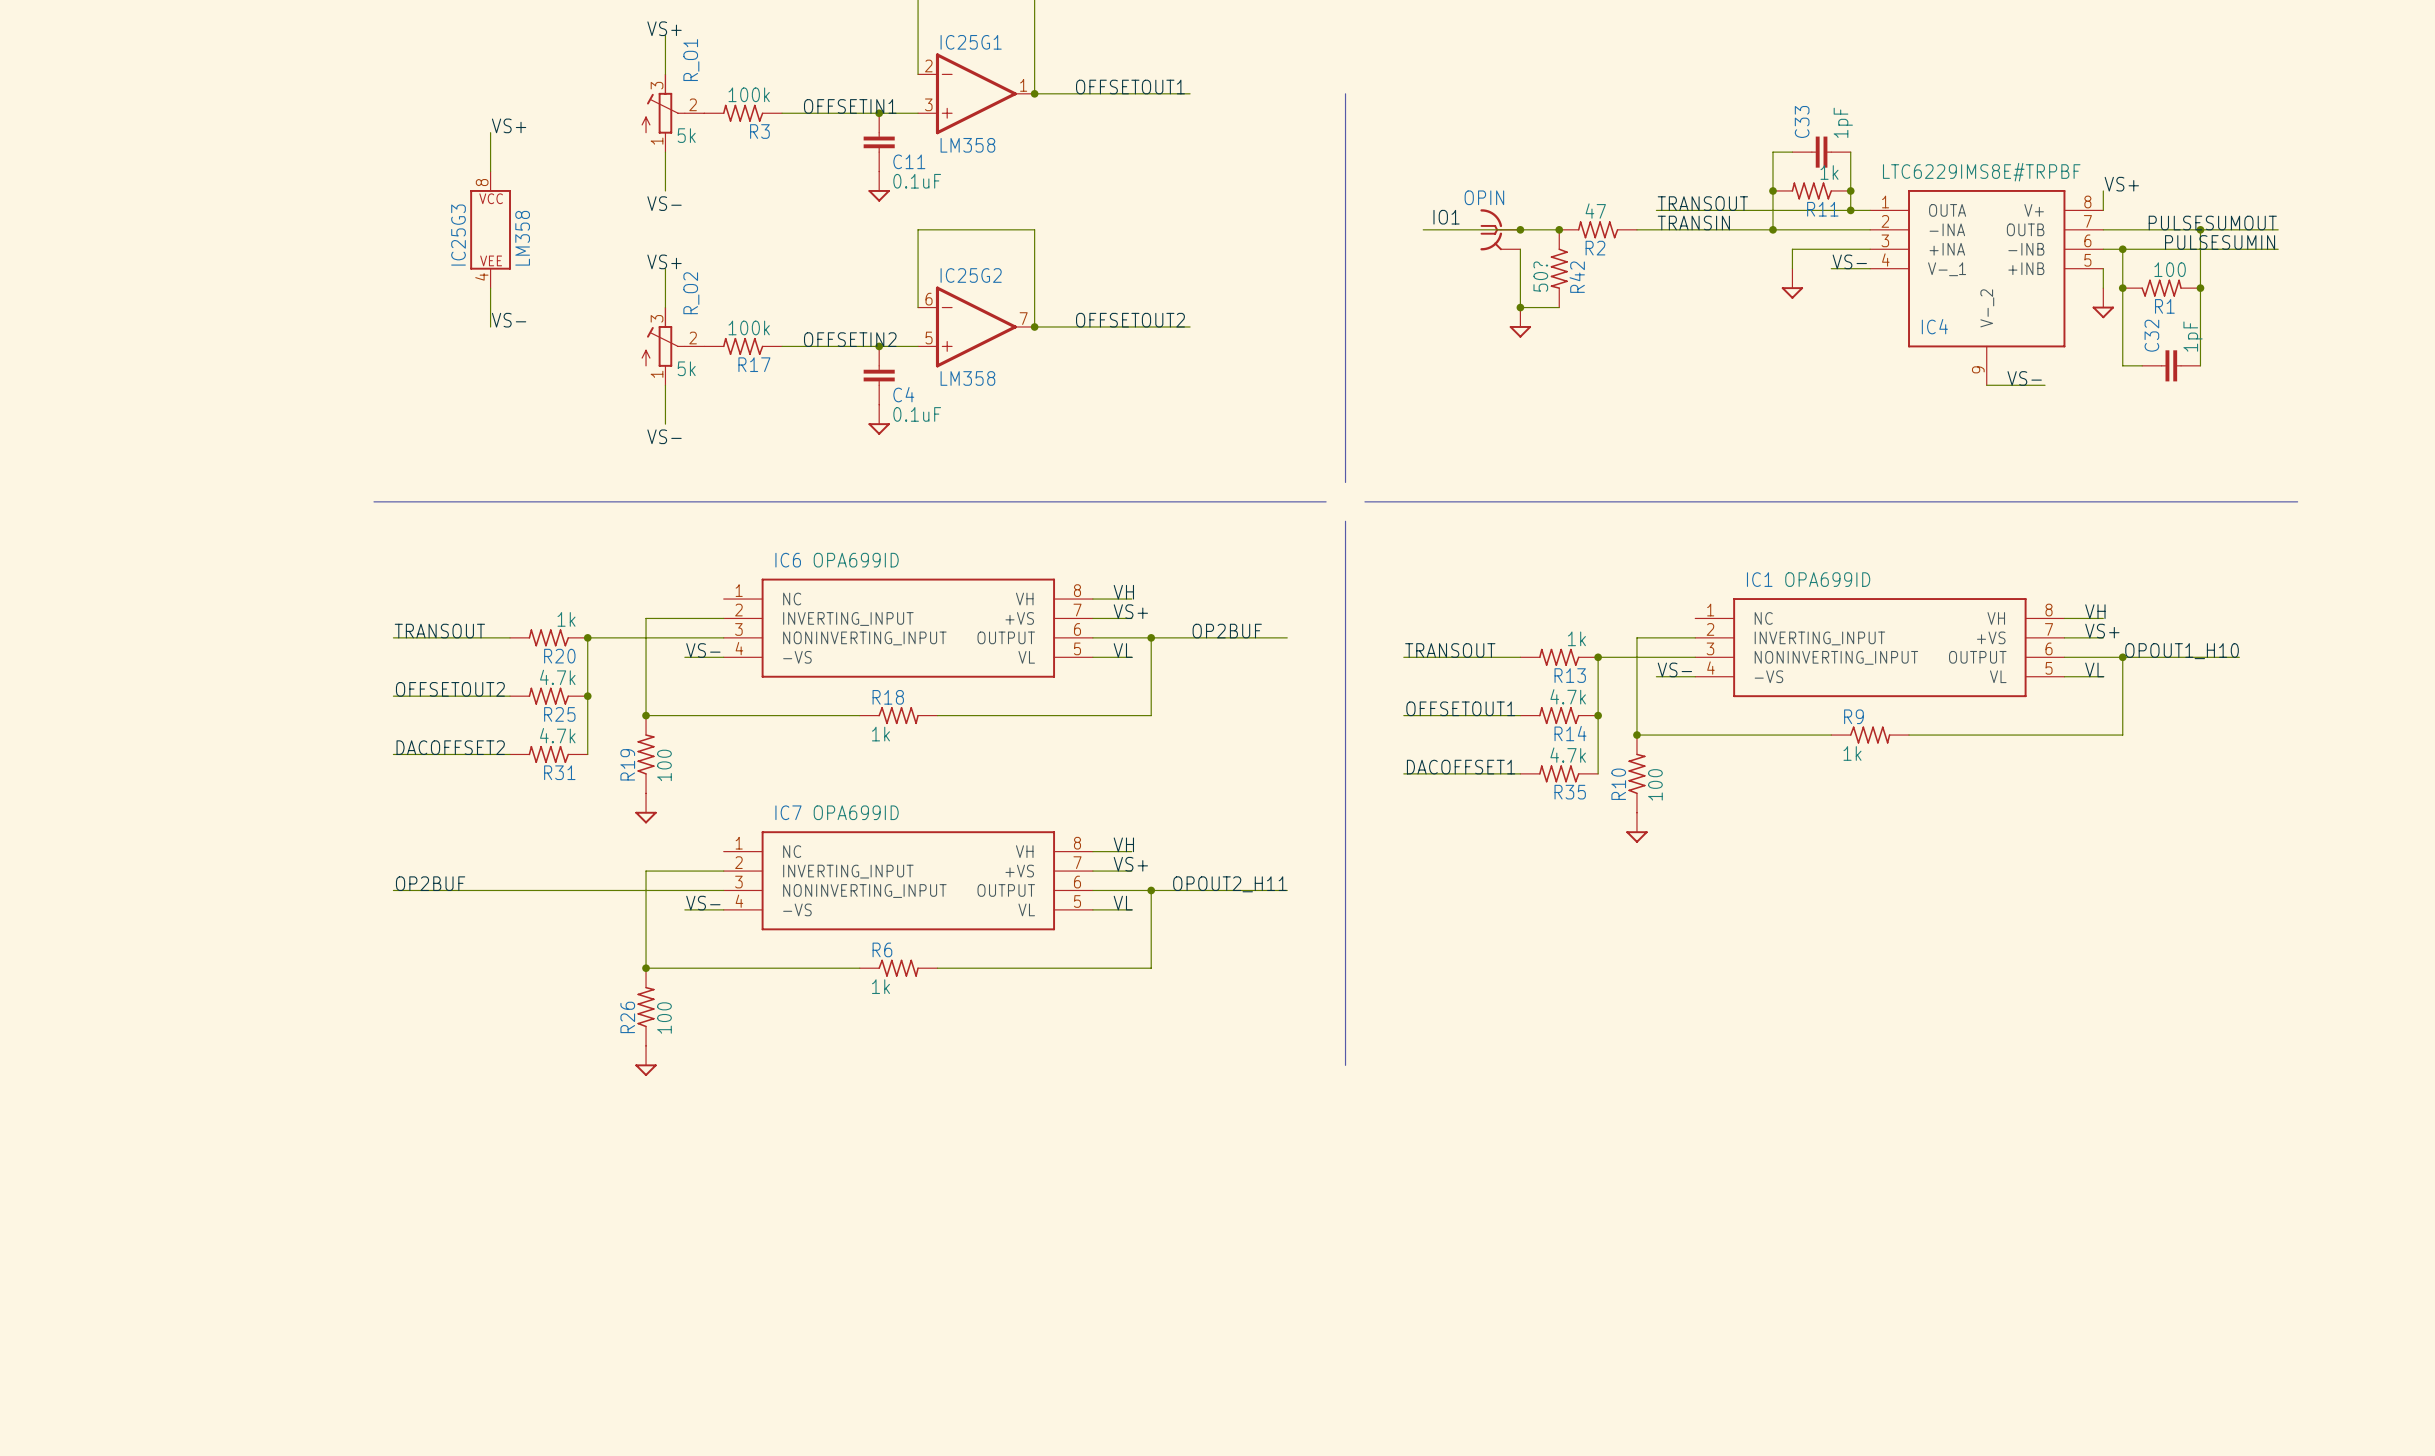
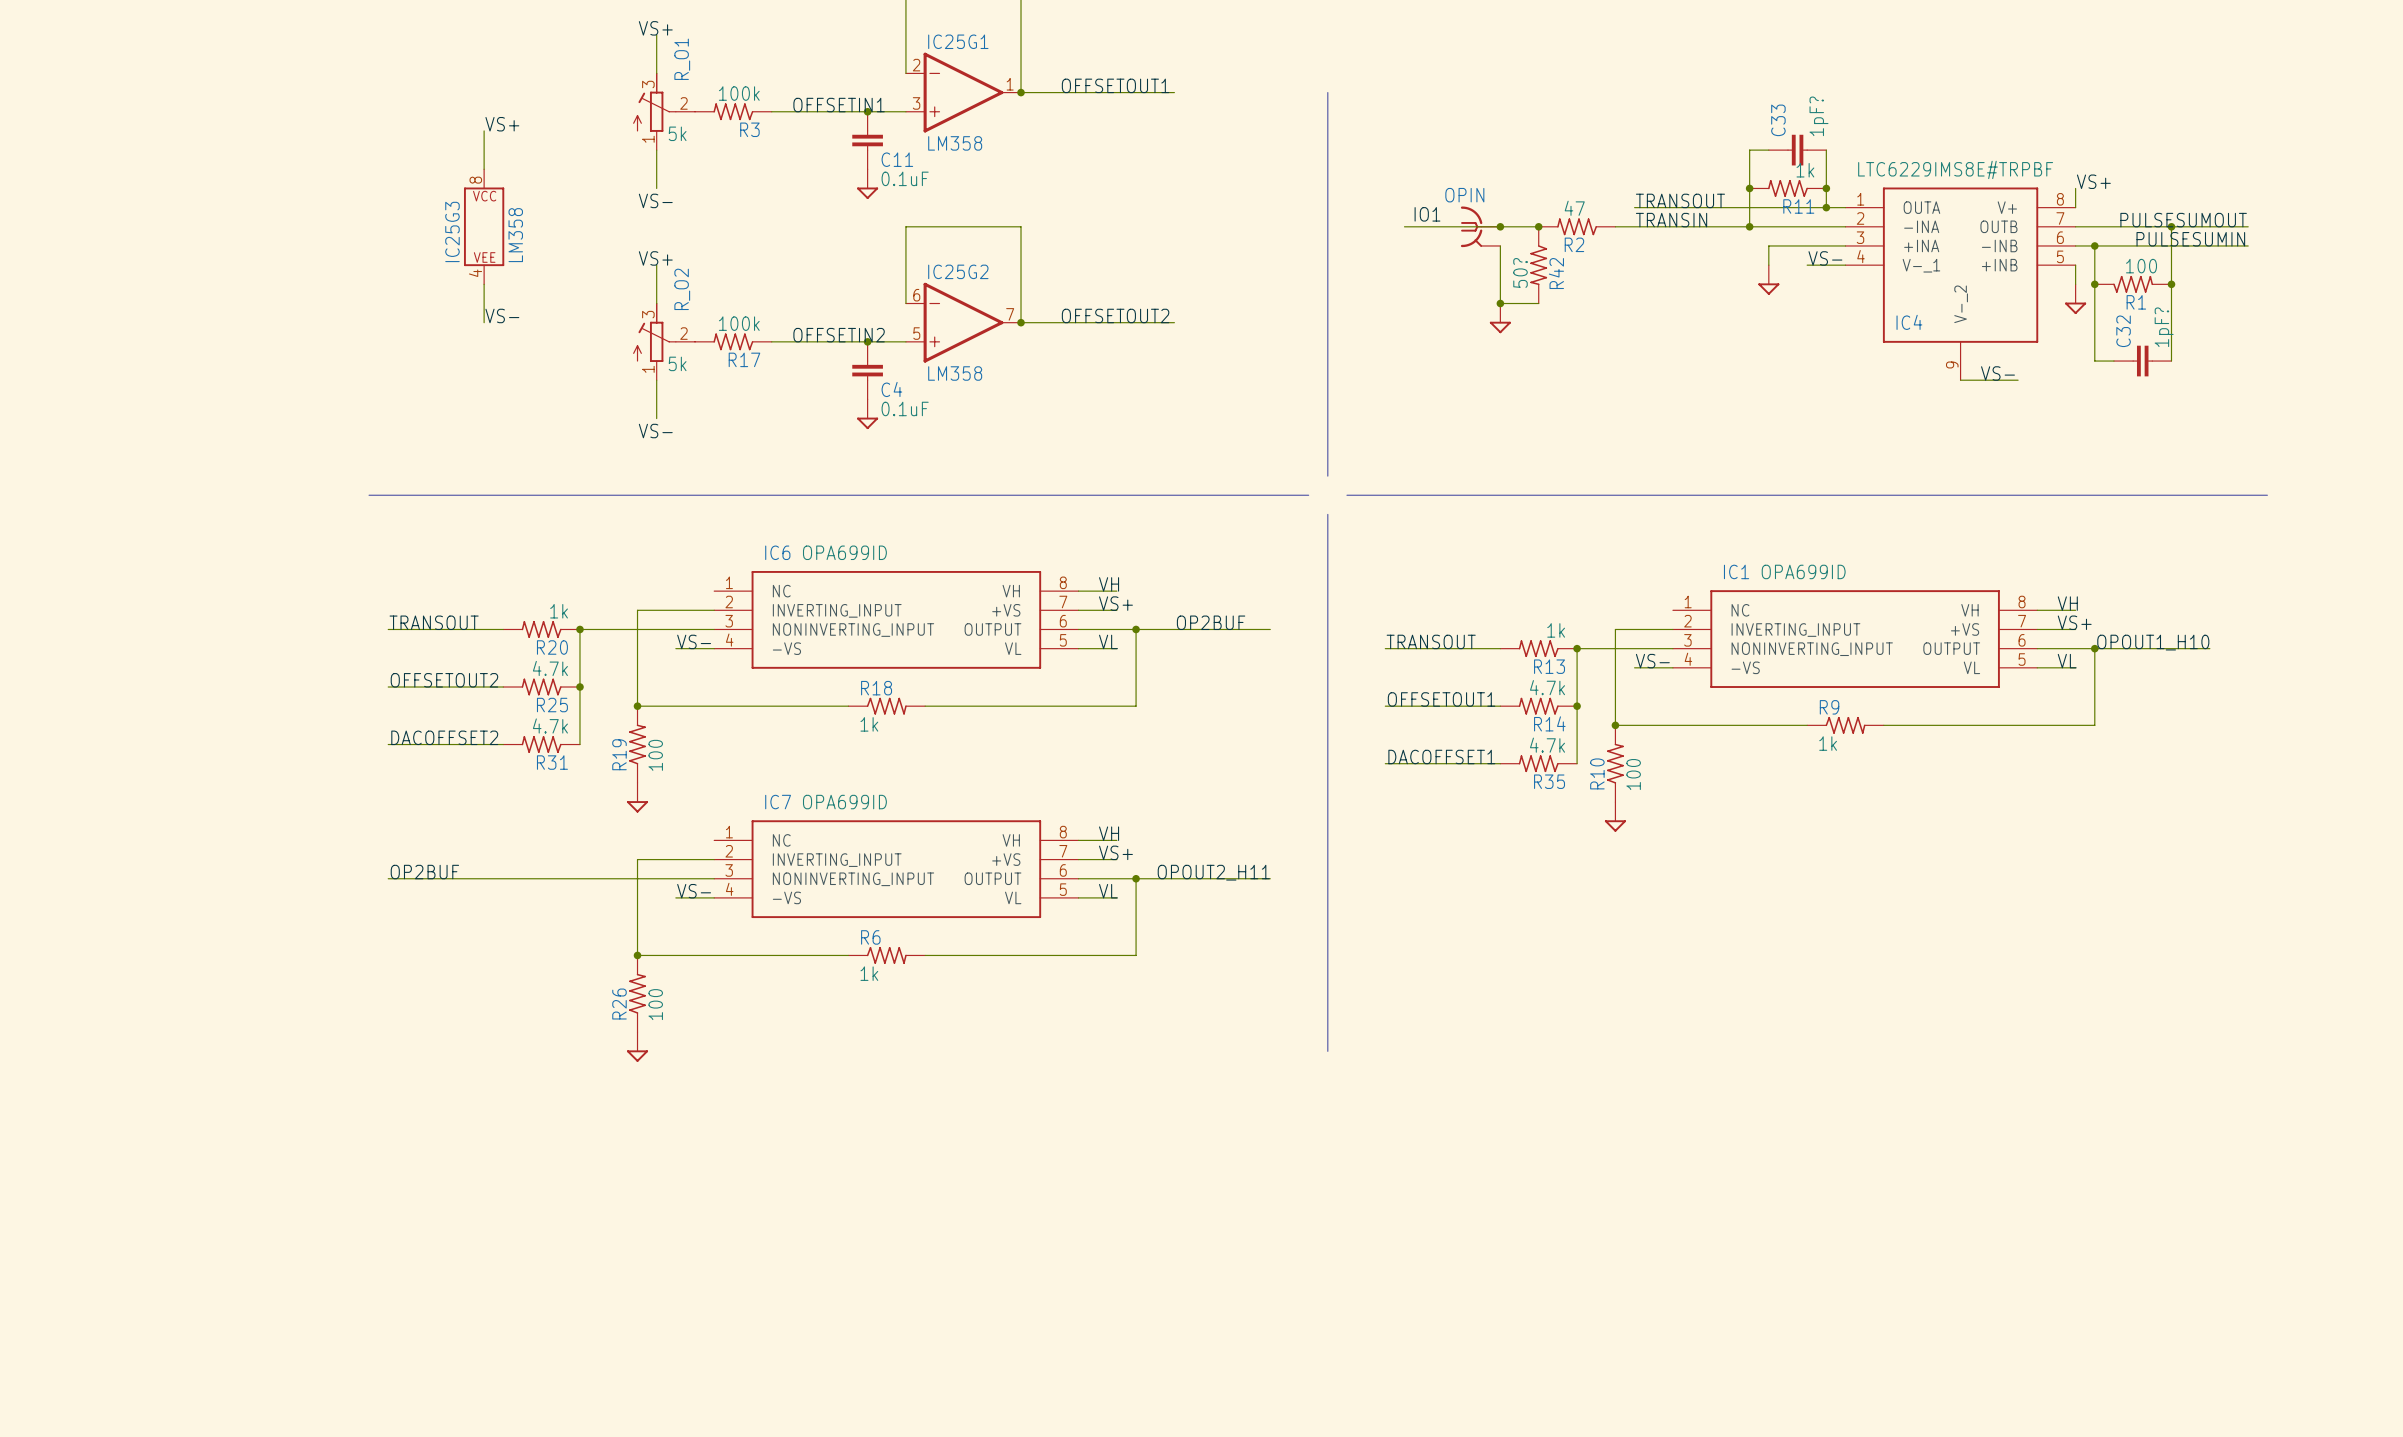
C33 value: 1pF (1843, 122) -> 1pF? (1818, 116)
C32 value: 1pF (2193, 336) -> 1pF? (2164, 327)

